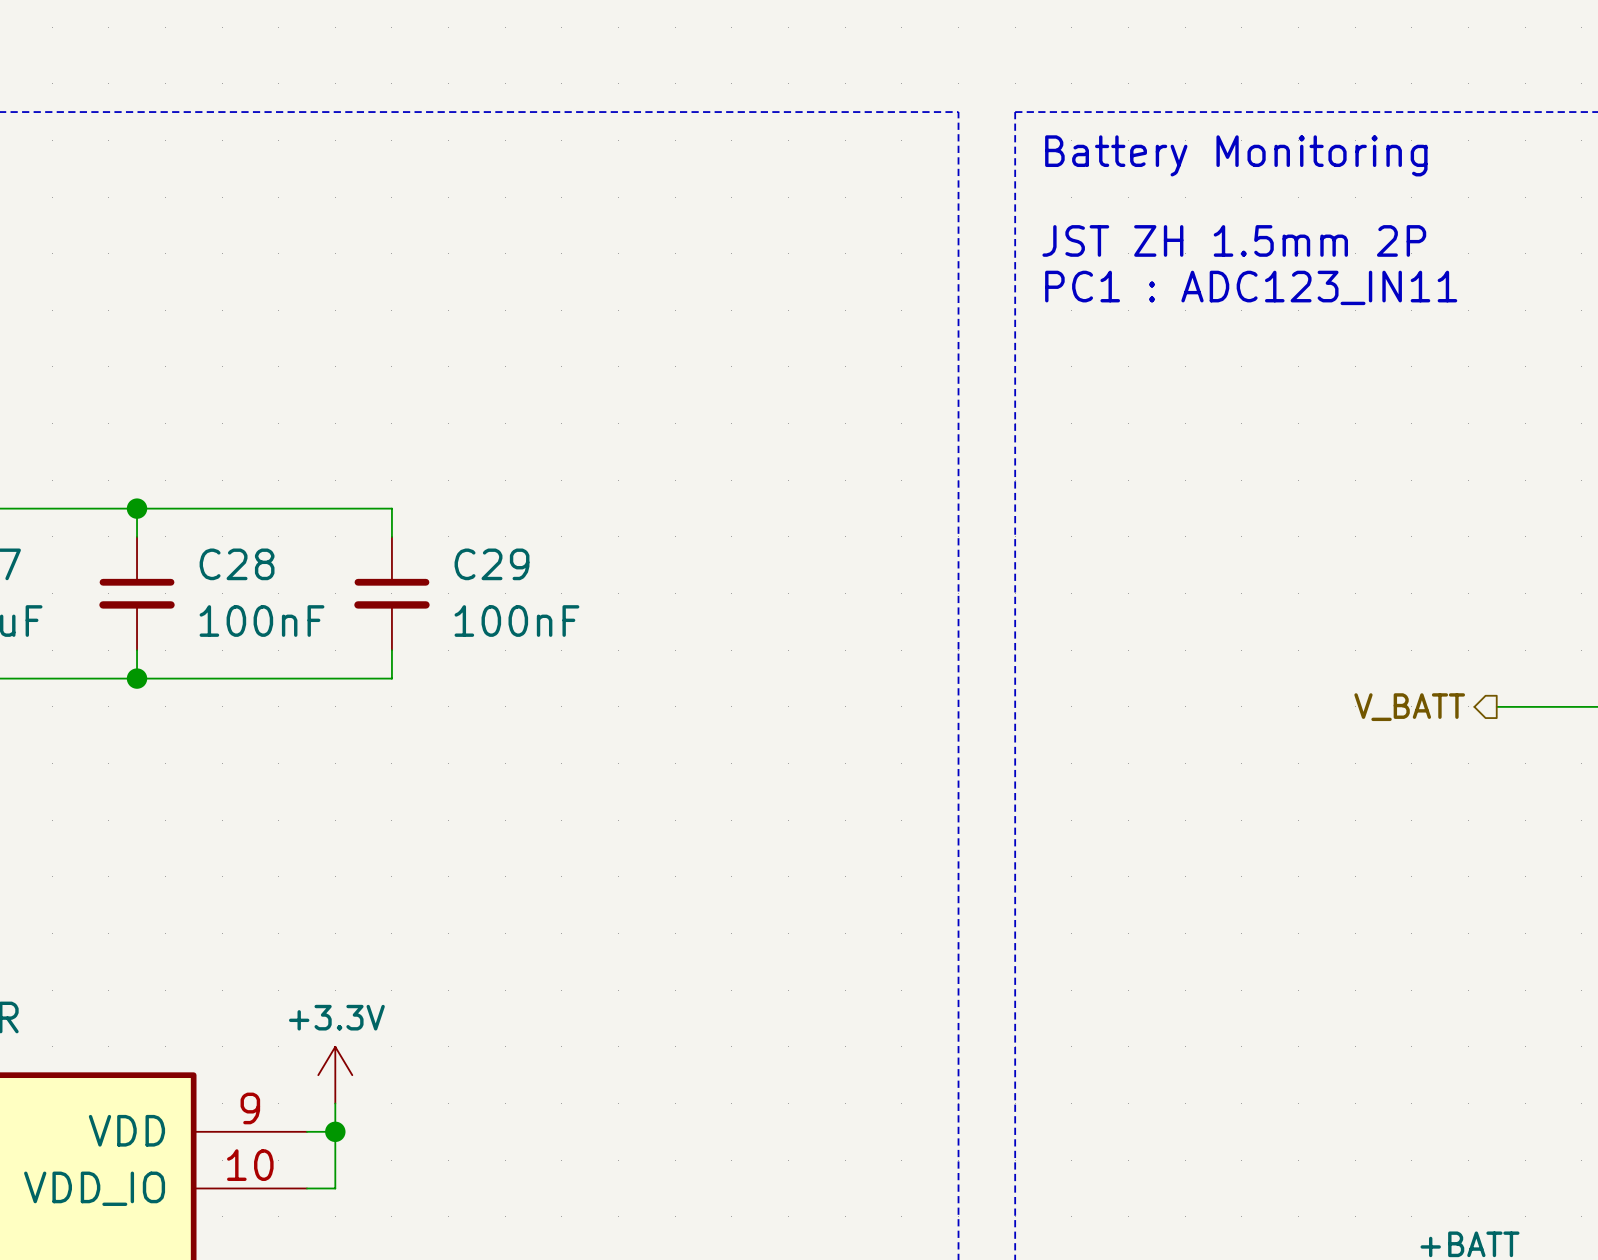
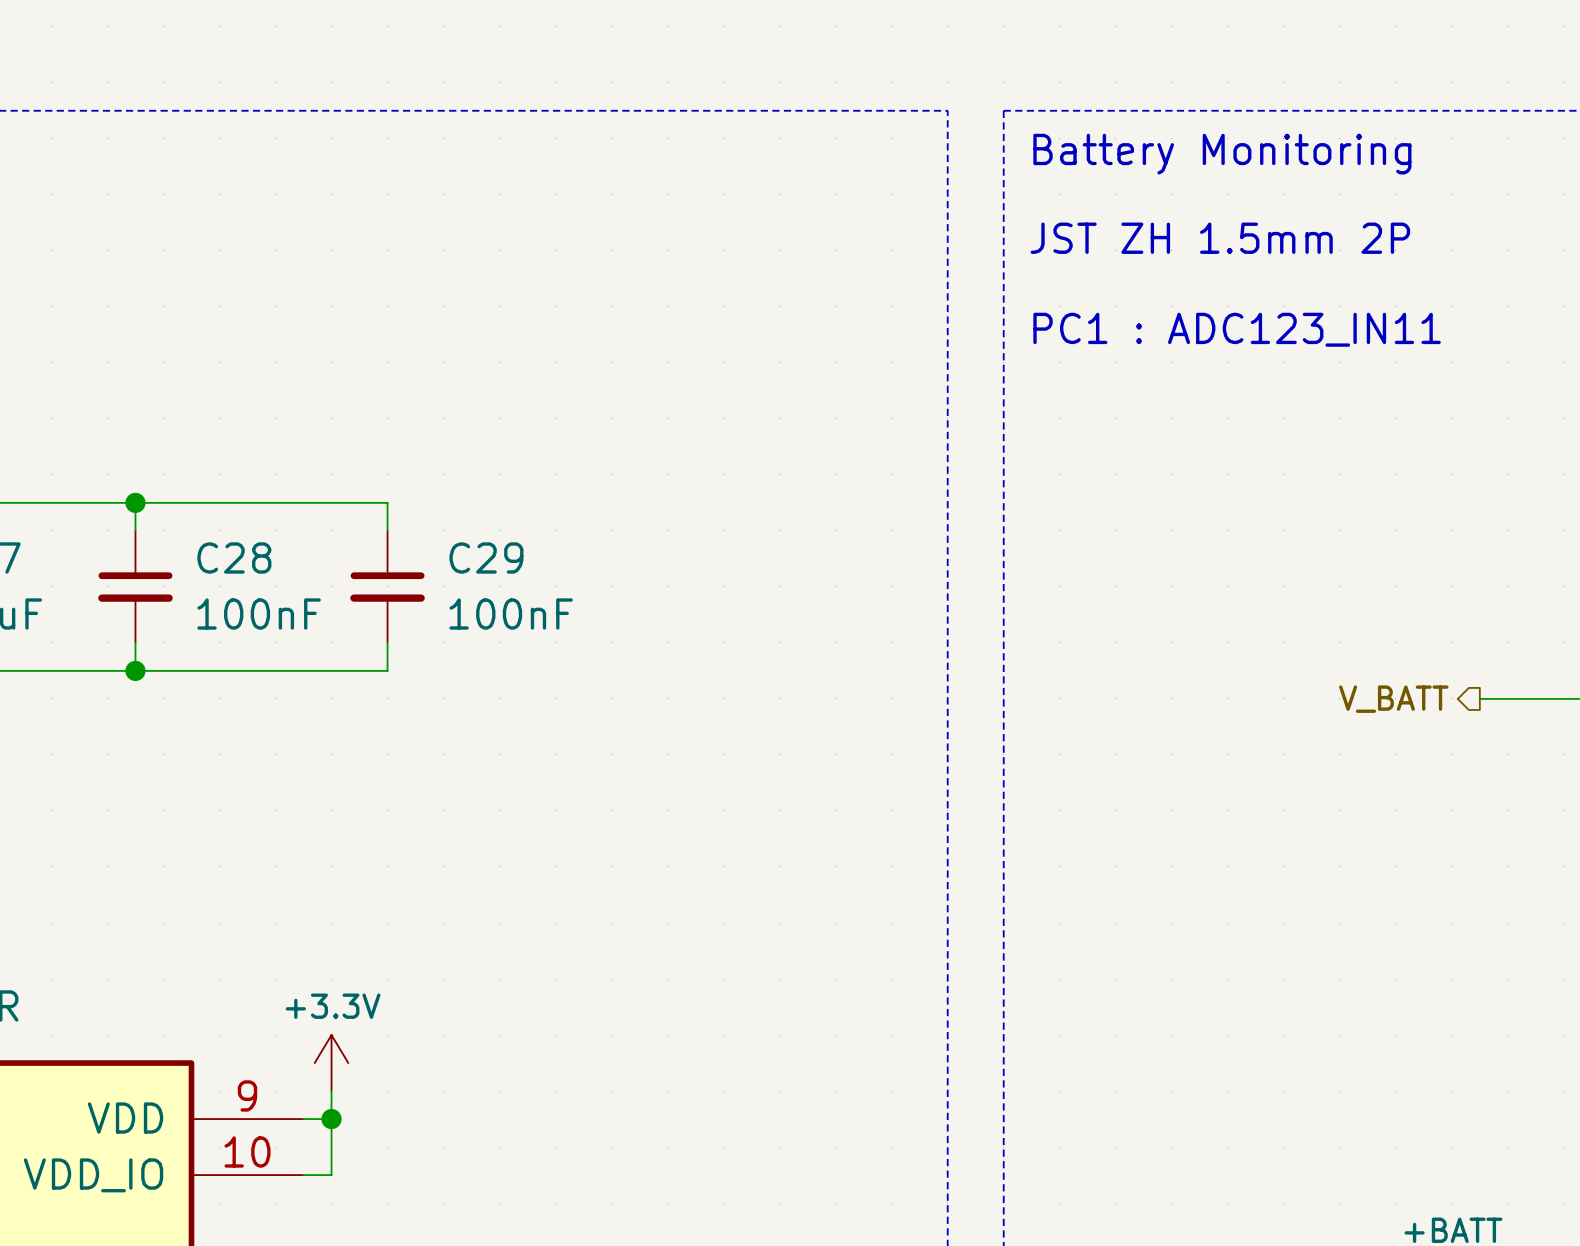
text position: PC1 : ADC123_IN11 (1251, 287) -> PC1 : ADC123_IN11 (1237, 329)

